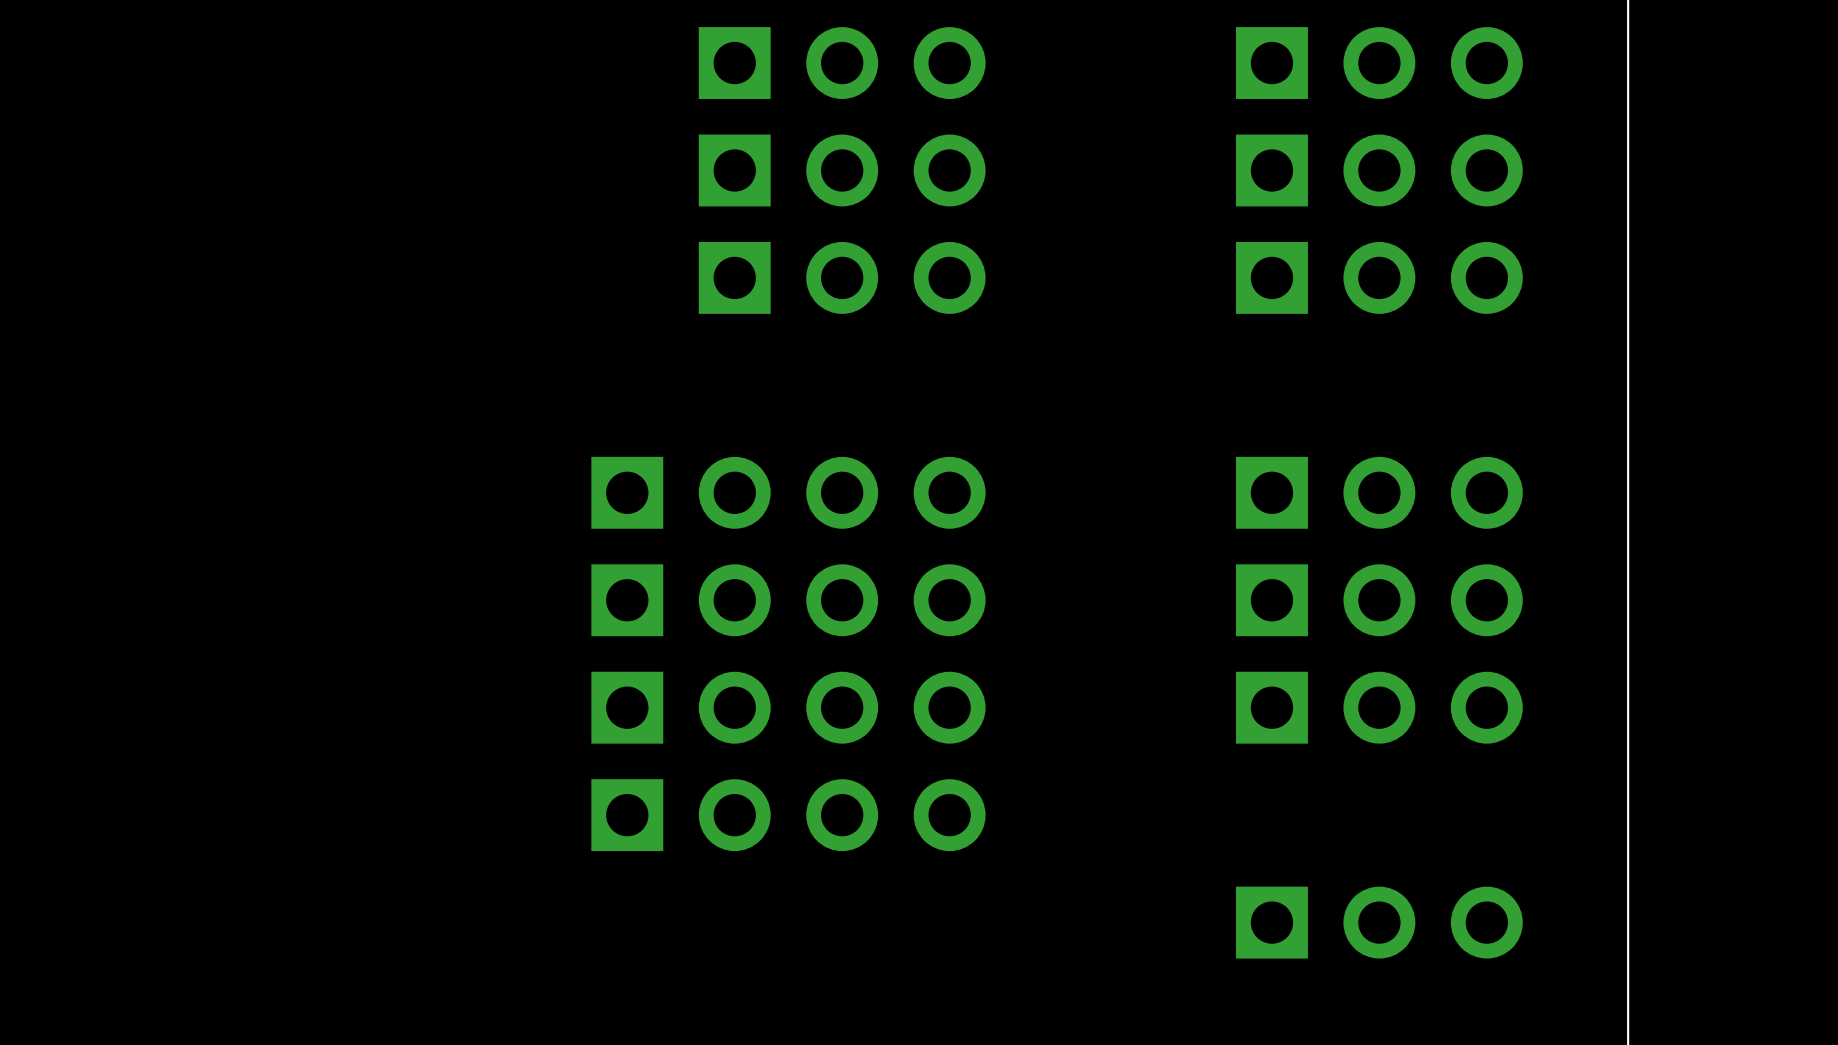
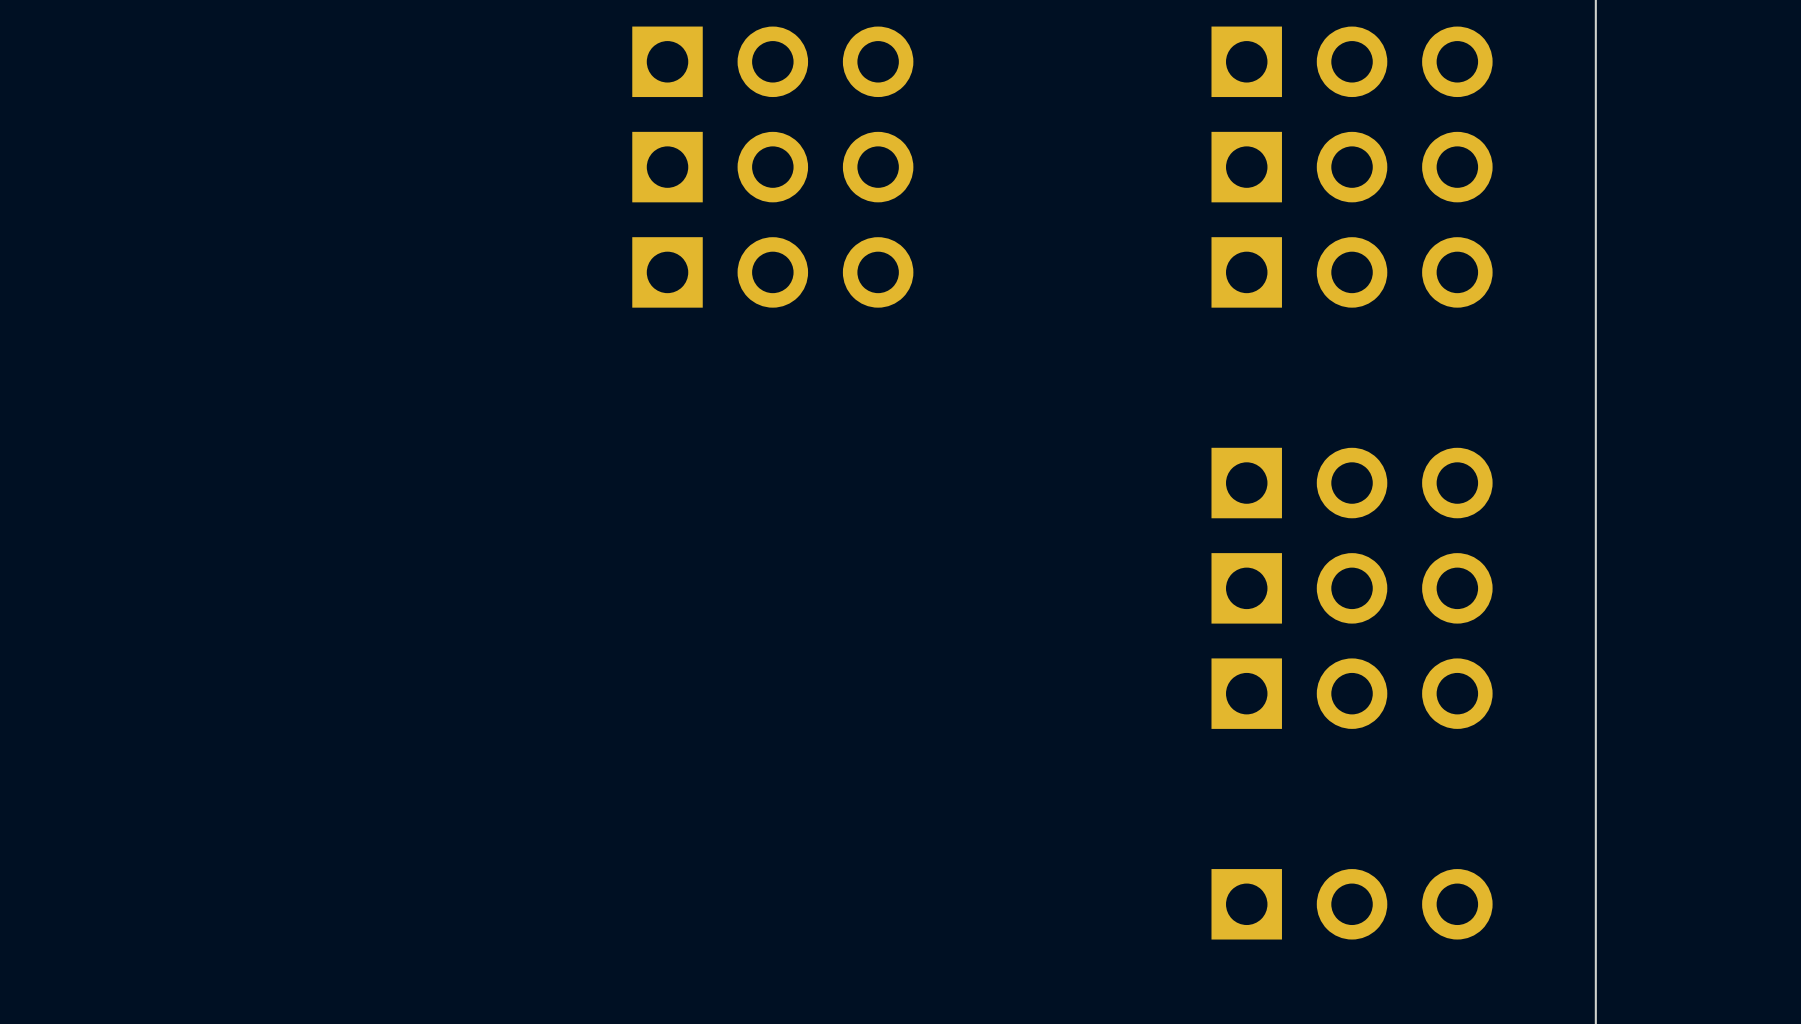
part position: (842, 63) -> (772, 61)
part position: (842, 170) -> (772, 167)
part position: (842, 277) -> (772, 272)
part: (788, 492) -> none
part: (788, 600) -> none
part: (788, 707) -> none
part: (788, 815) -> none

